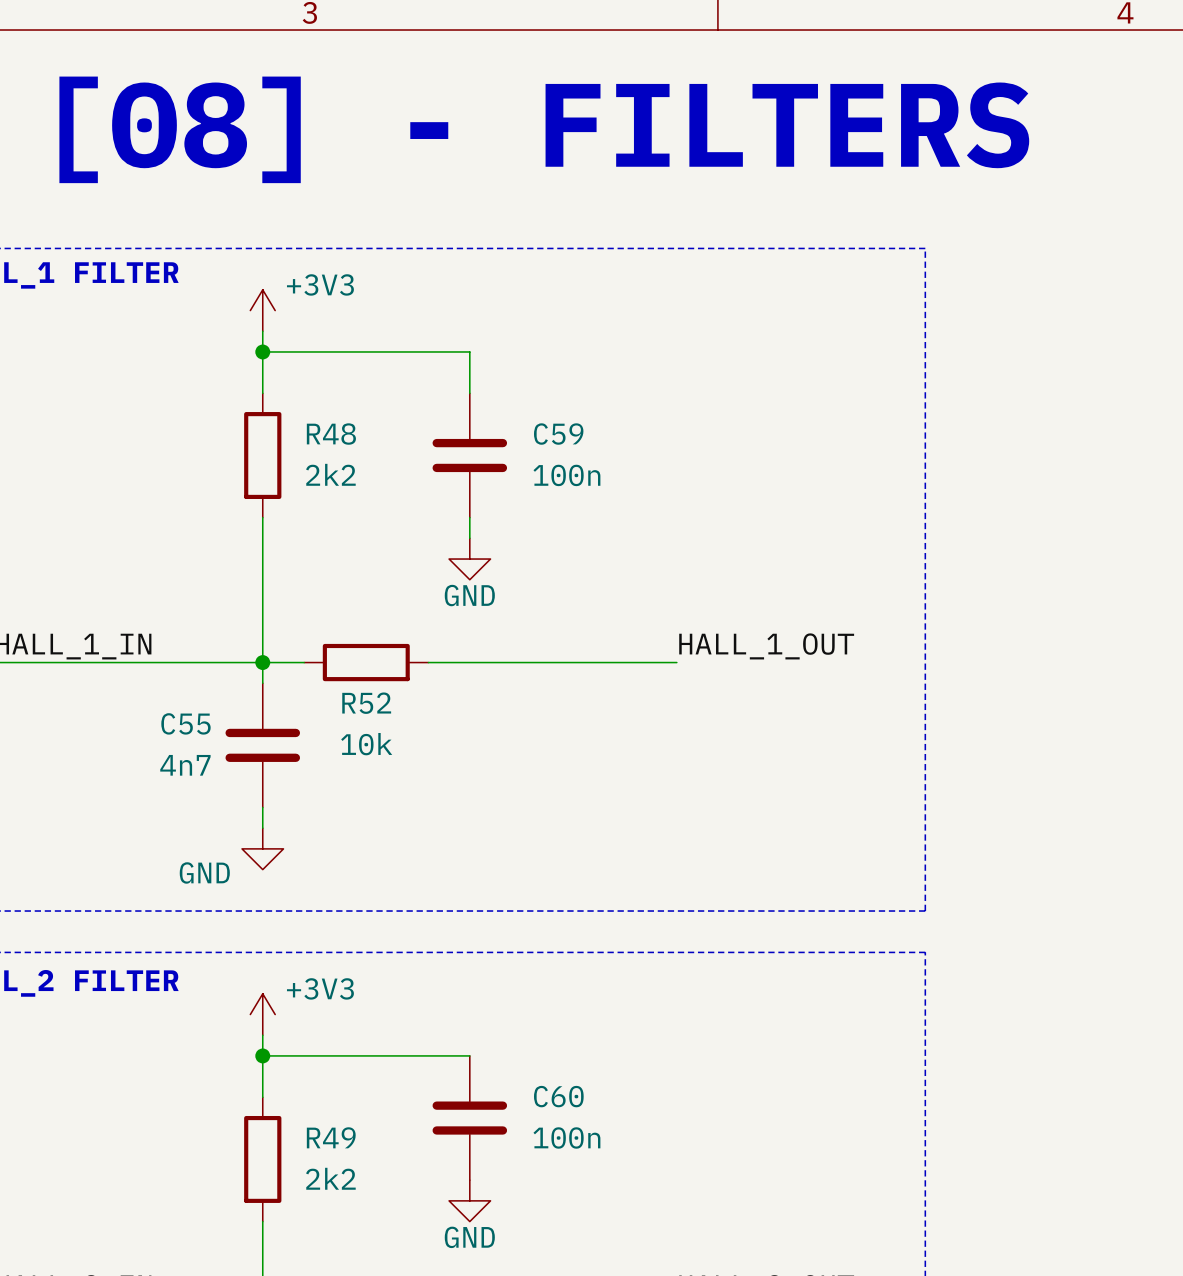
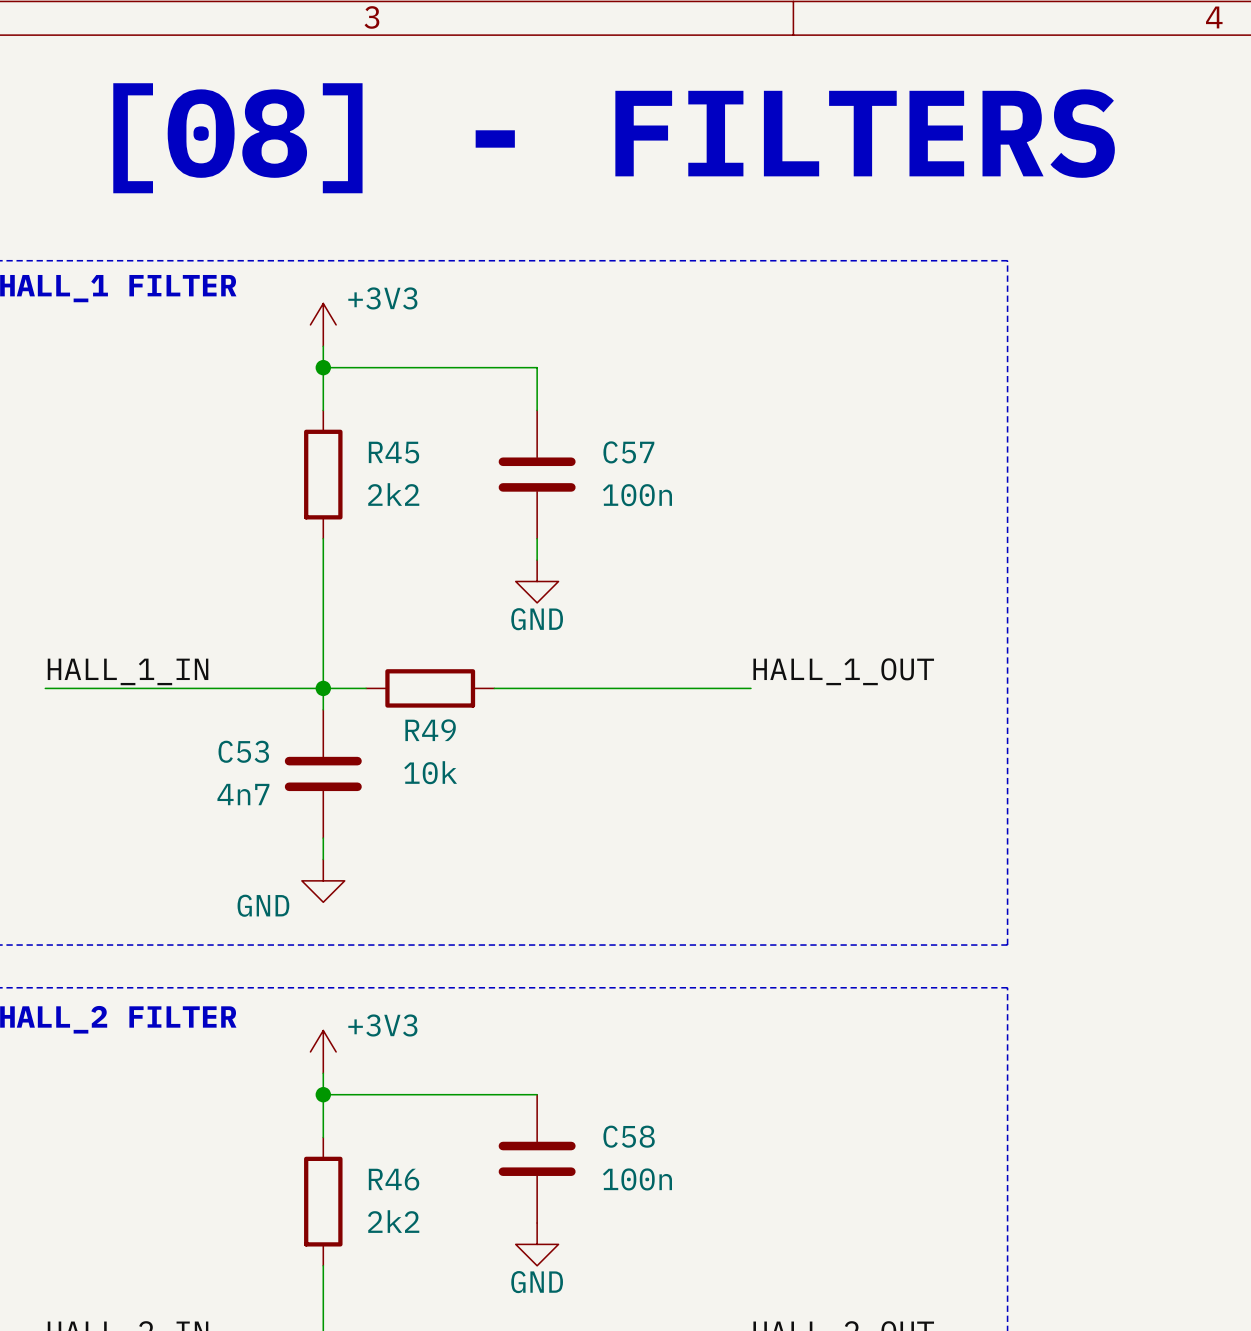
R48 name: R48 (331, 434) -> R45 (393, 452)
C59 name: C59 (558, 434) -> C57 (628, 452)
R52 name: R52 (366, 703) -> R49 (430, 730)
C55 name: C55 (185, 723) -> C53 (243, 751)
C60 name: C60 (558, 1096) -> C58 (629, 1136)
R49 name: R49 (331, 1137) -> R46 (394, 1179)

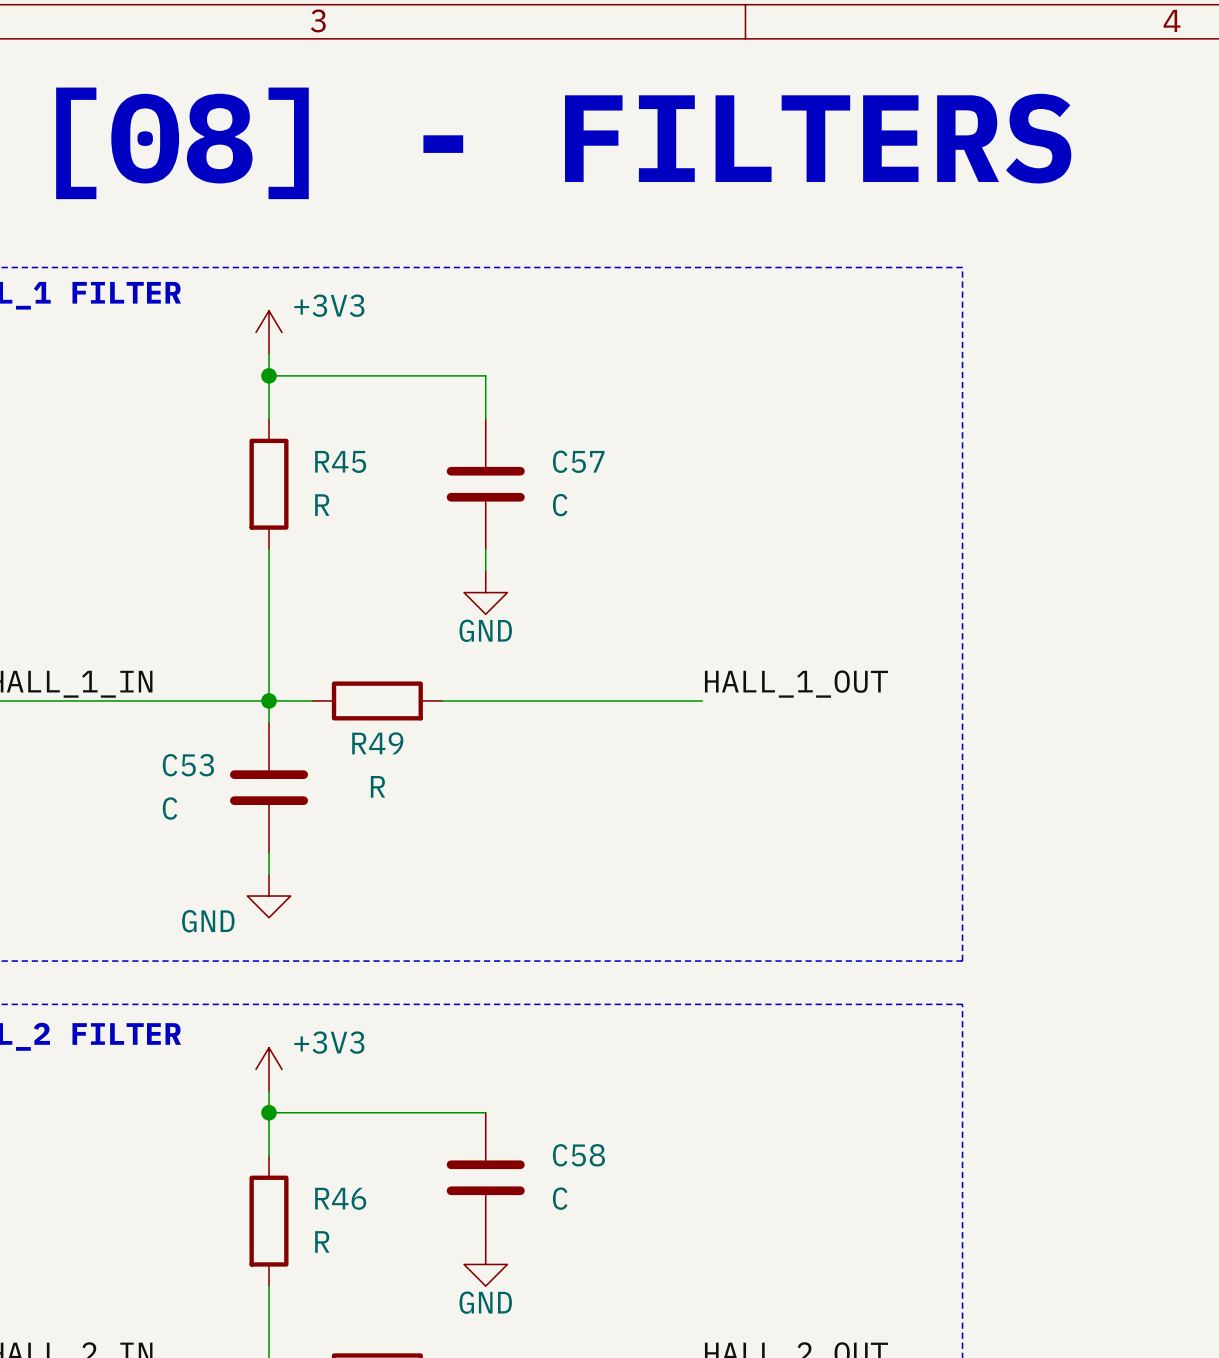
R45 value: 2k2 (393, 494) -> R (322, 505)
C57 value: 100n (637, 495) -> C (560, 505)
R49 value: 10k (430, 772) -> R (377, 786)
C53 value: 4n7 (243, 794) -> C (170, 808)
C58 value: 100n (637, 1179) -> C (560, 1198)
R46 value: 2k2 (393, 1221) -> R (322, 1241)

